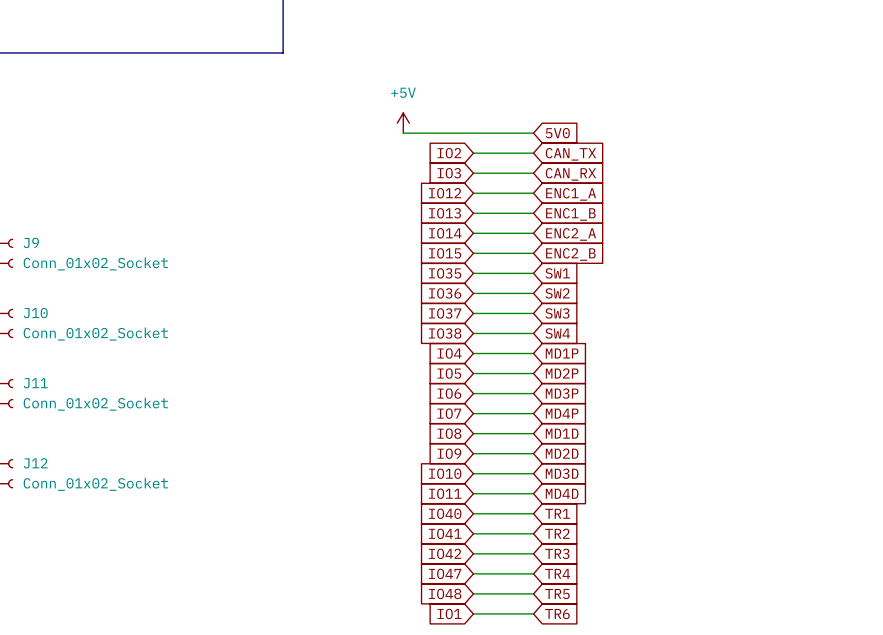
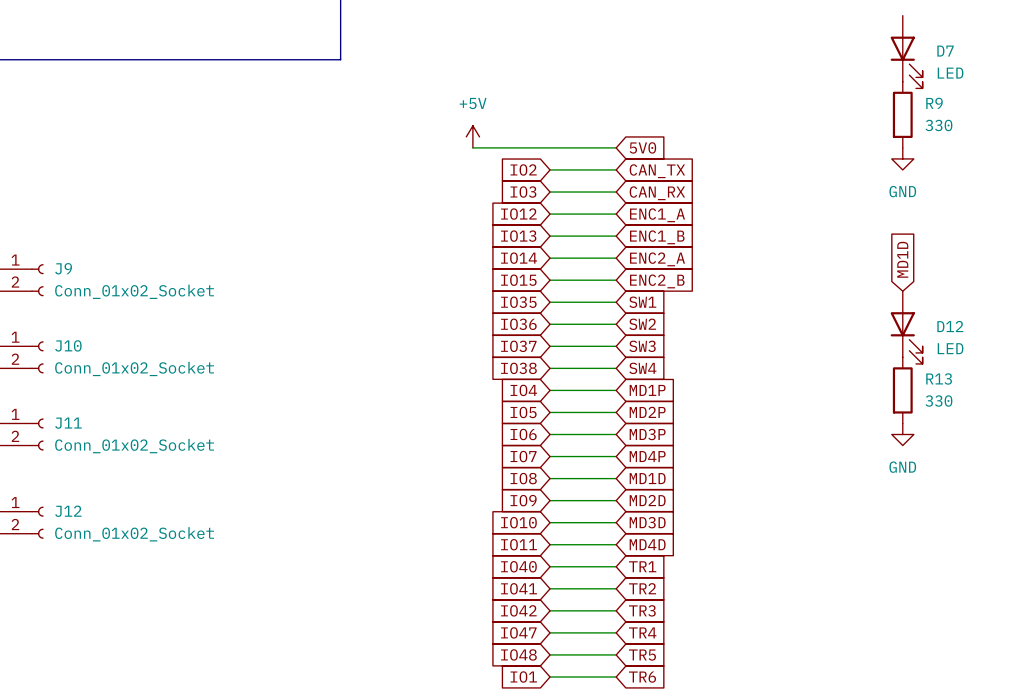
D7: none -> LED (906, 52)
R9: none -> 330 (902, 114)
power symbol: none -> GND (902, 158)
global label: none -> MD1D (902, 259)
D12: none -> LED (906, 327)
R13: none -> 330 (902, 390)
power symbol: none -> GND (902, 434)

